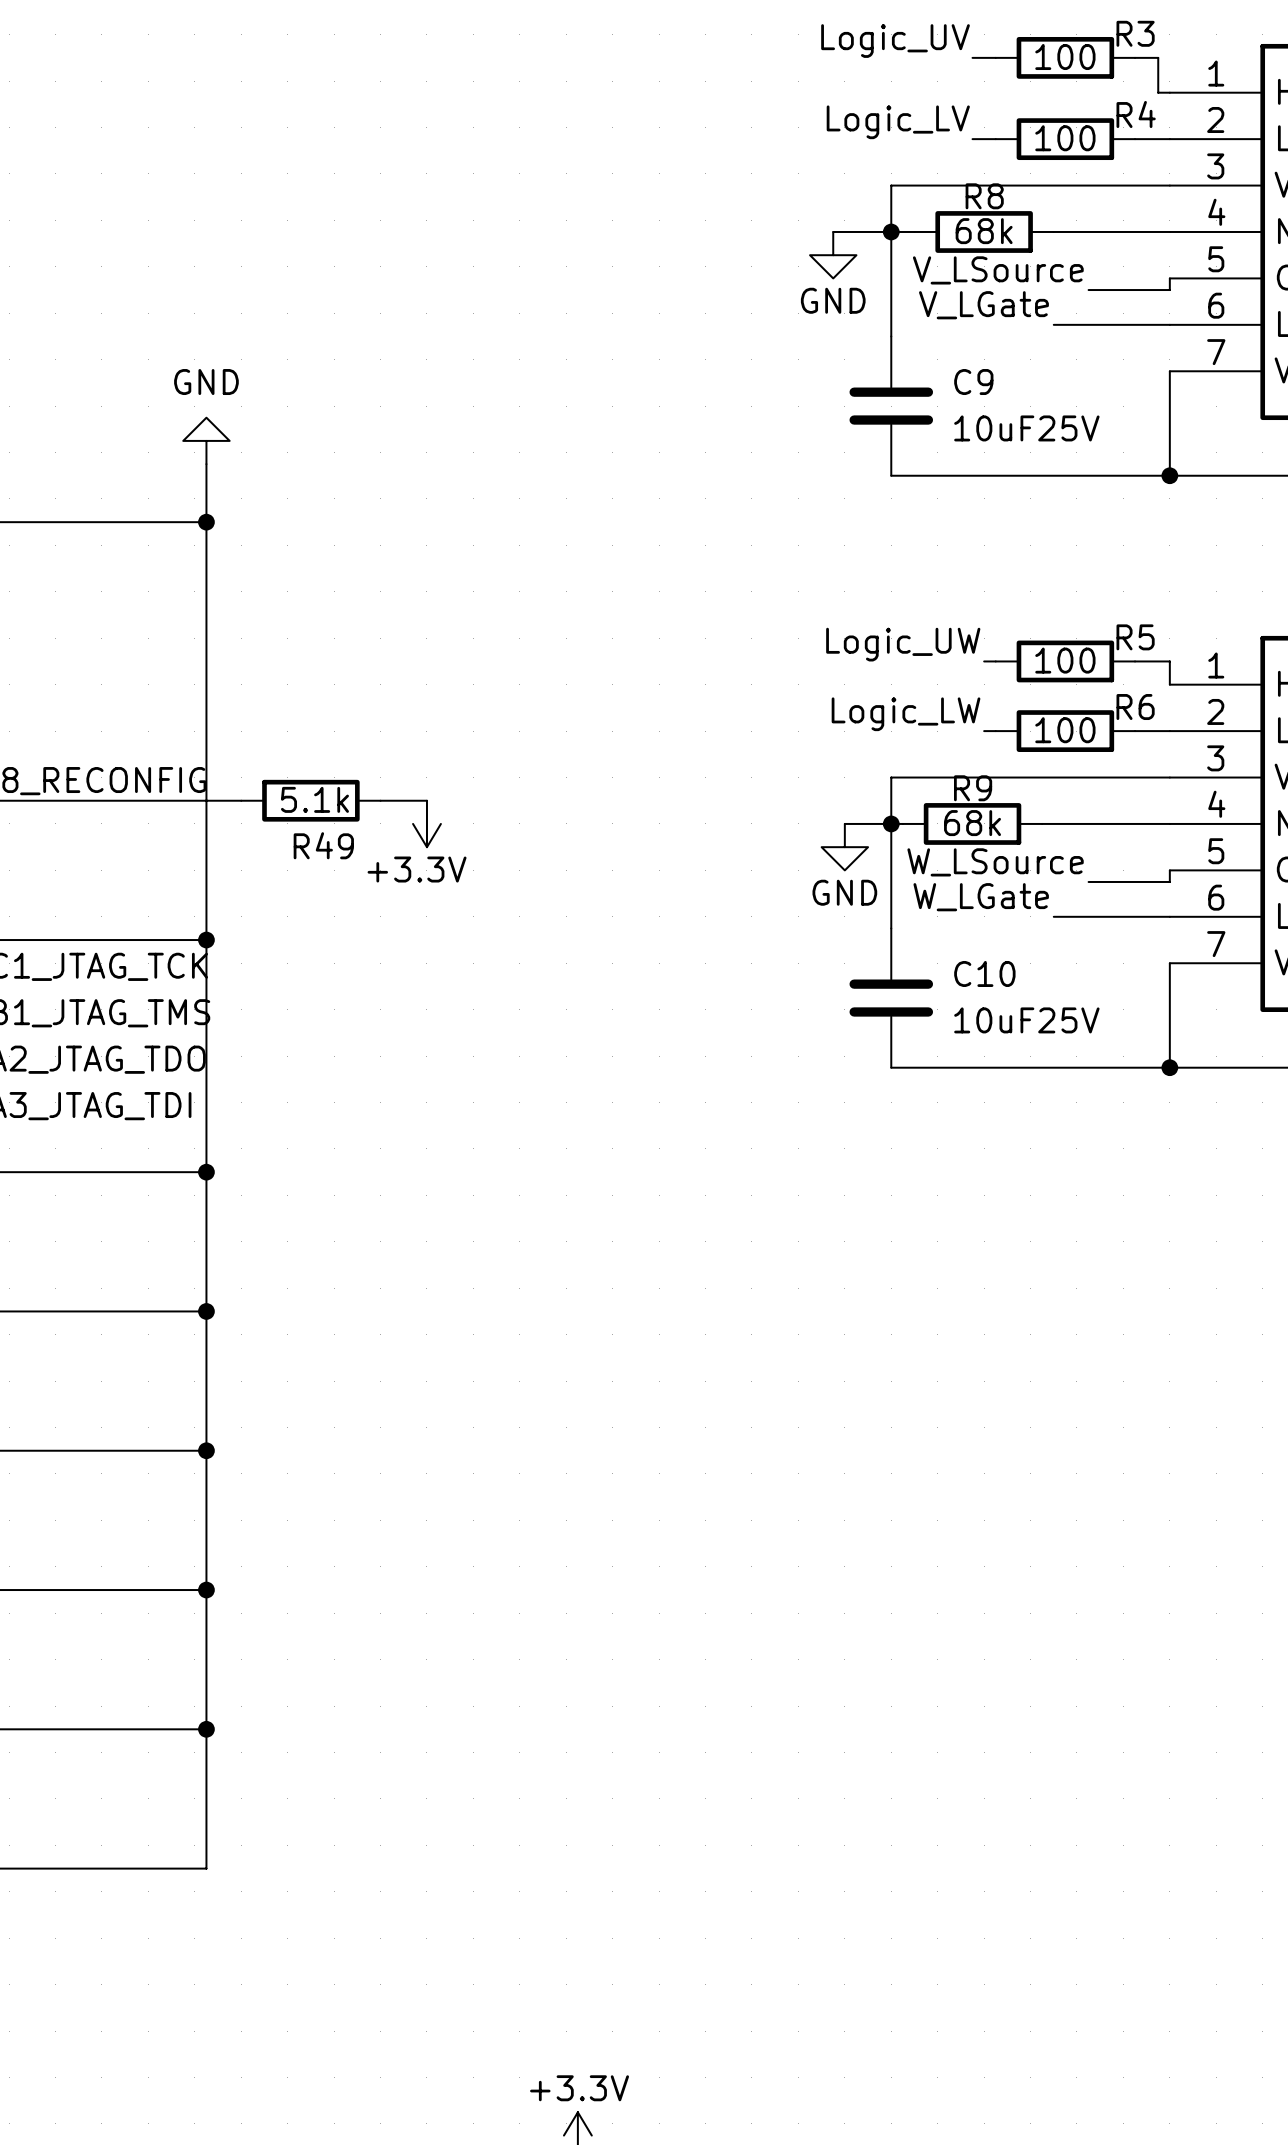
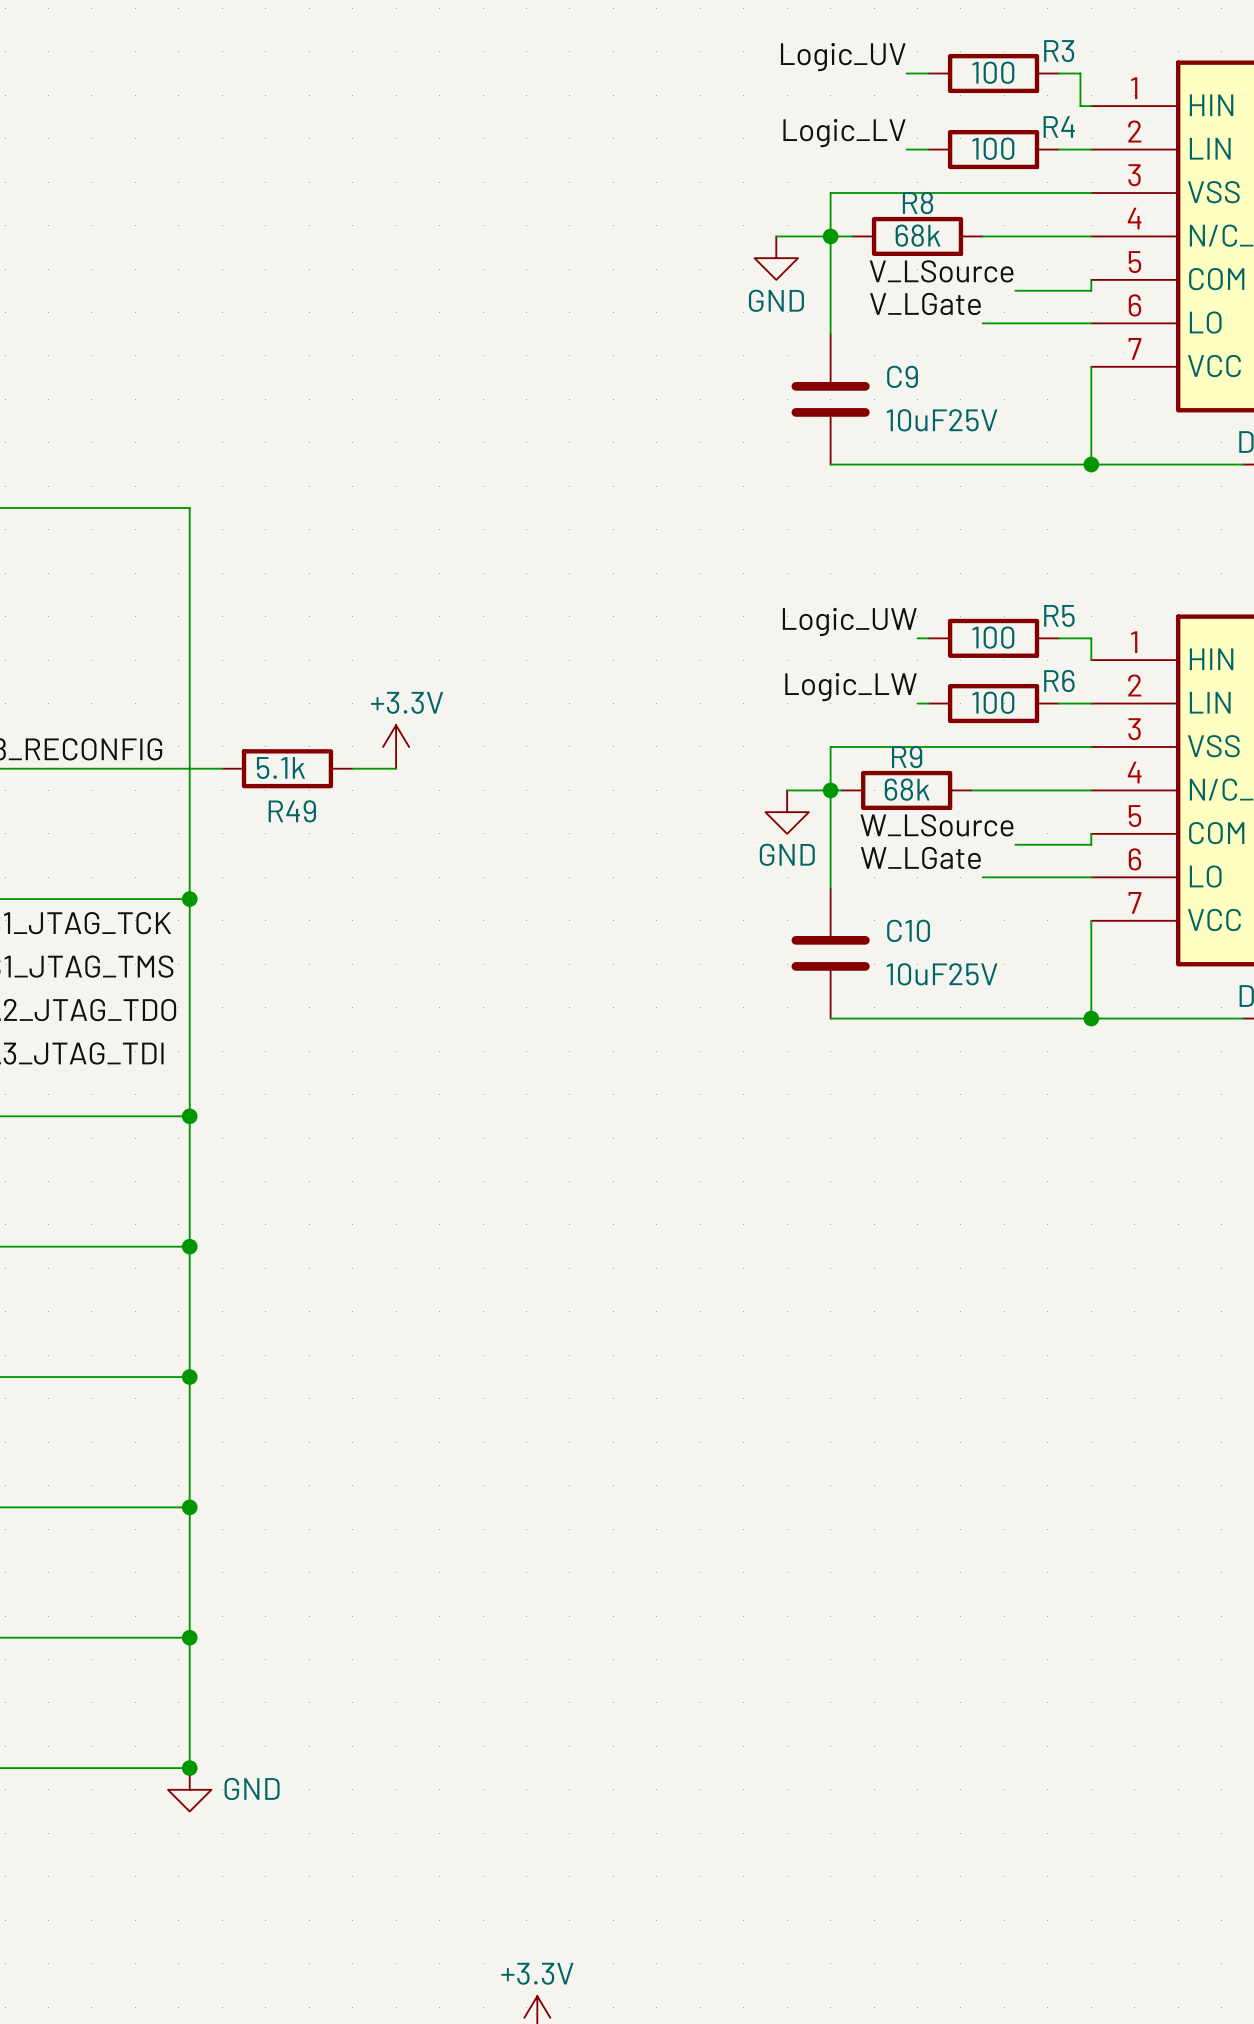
power symbol: GND (206, 440) -> none
wire: (206, 464) (206, 522) -> none
junction: (206, 522) -> none
power symbol rotation: 0° (426, 823) -> 180° (396, 746)
power symbol position: +3.3V (426, 823) -> +3.3V (396, 746)
junction: none -> (189, 1768)
power symbol: none -> GND (189, 1789)

